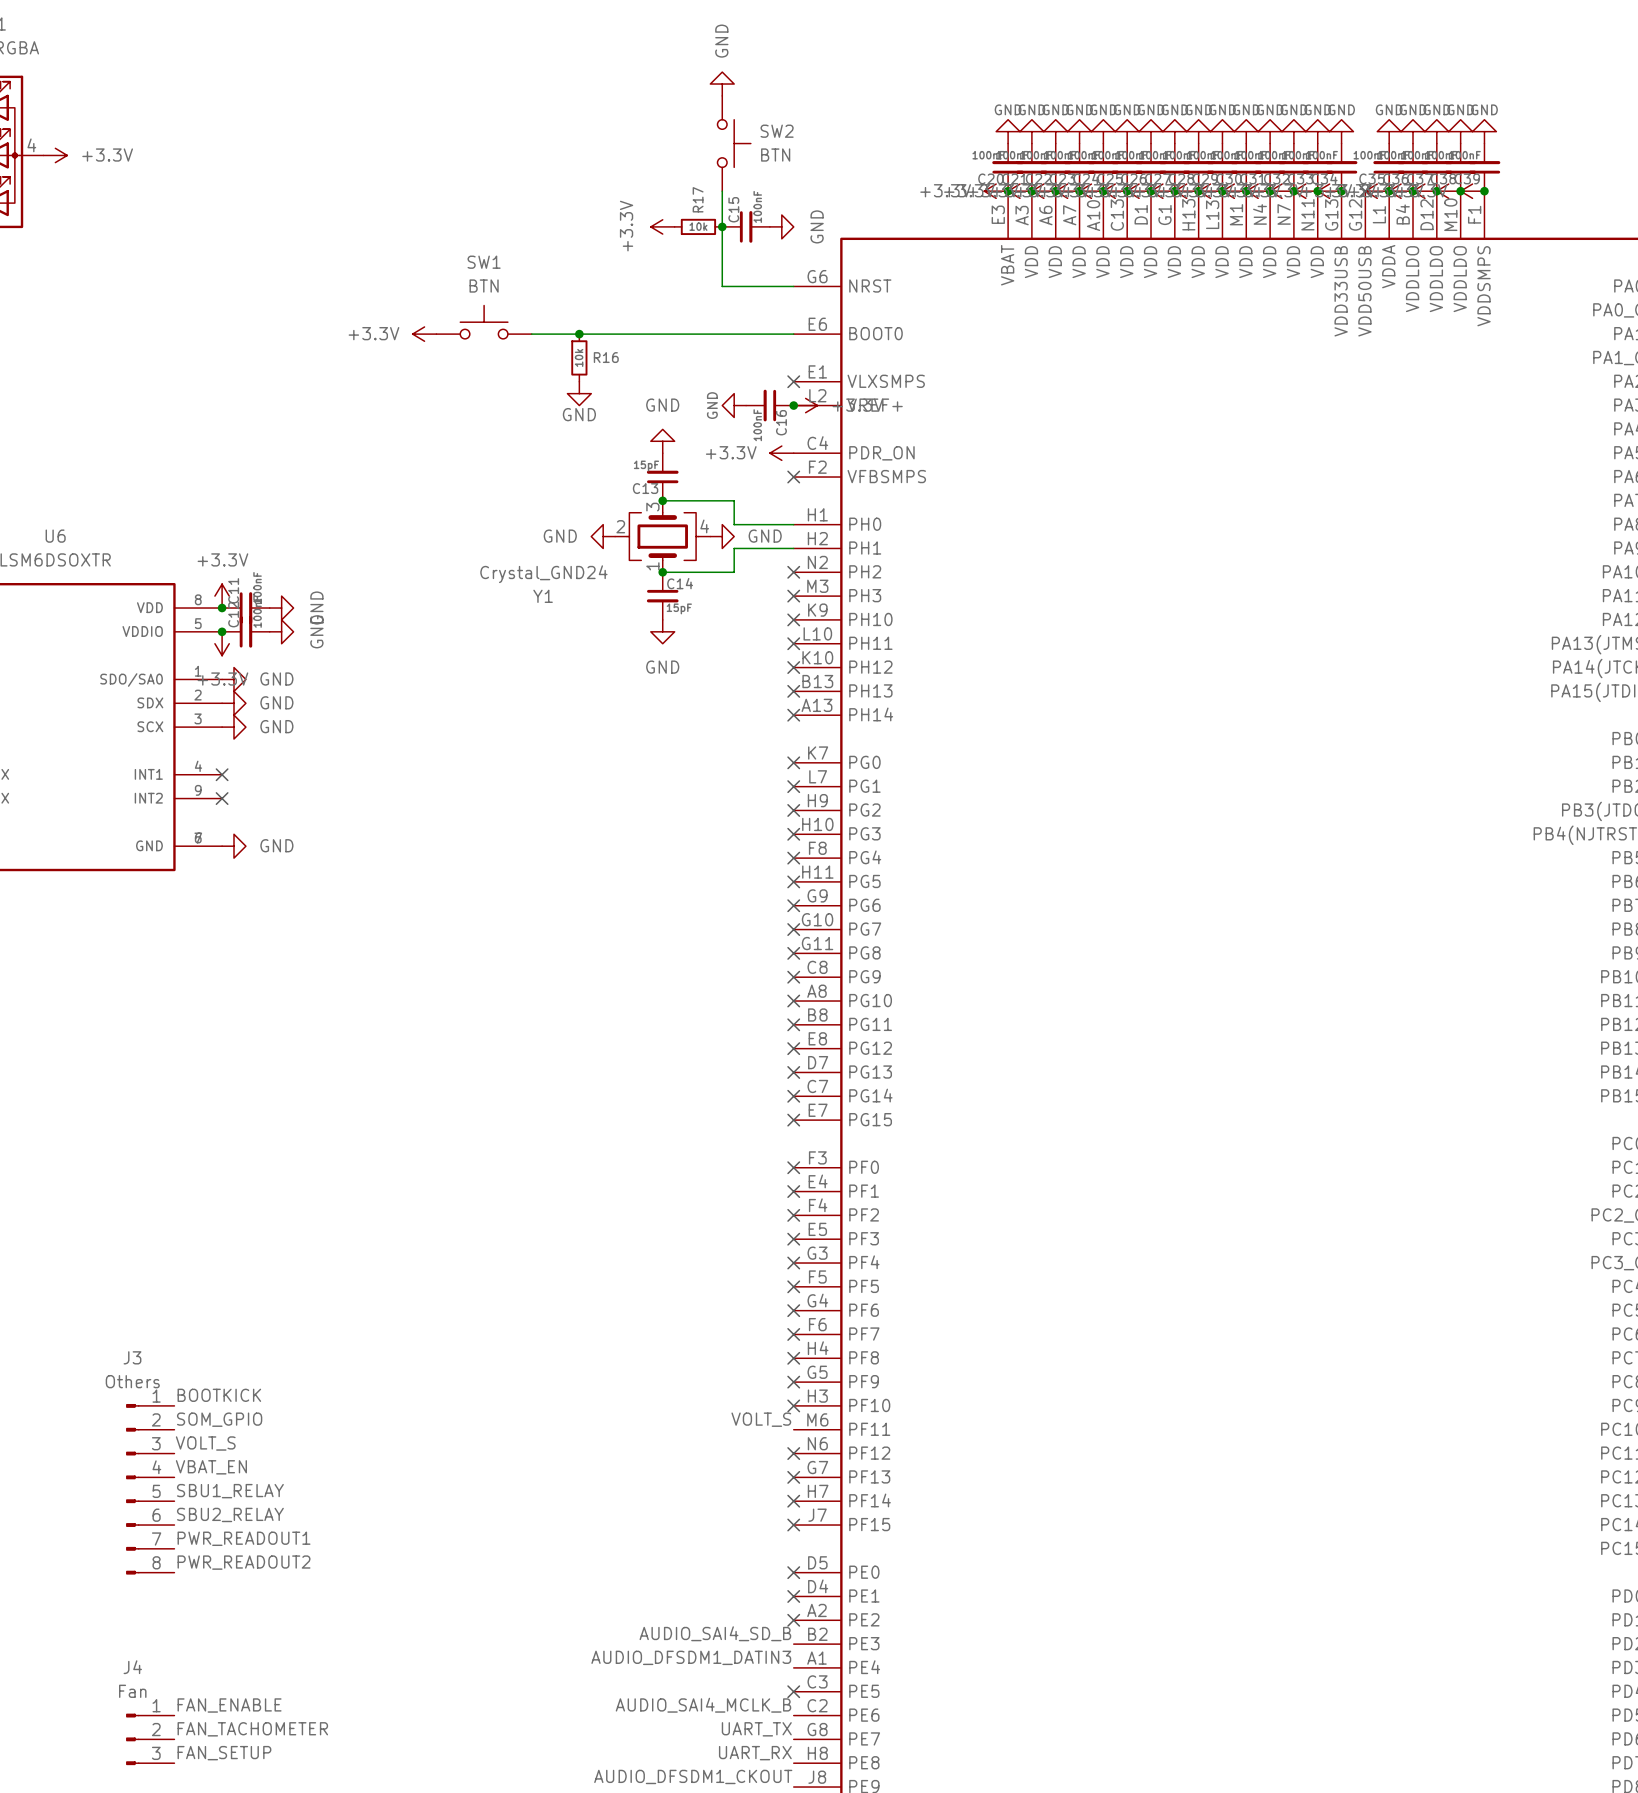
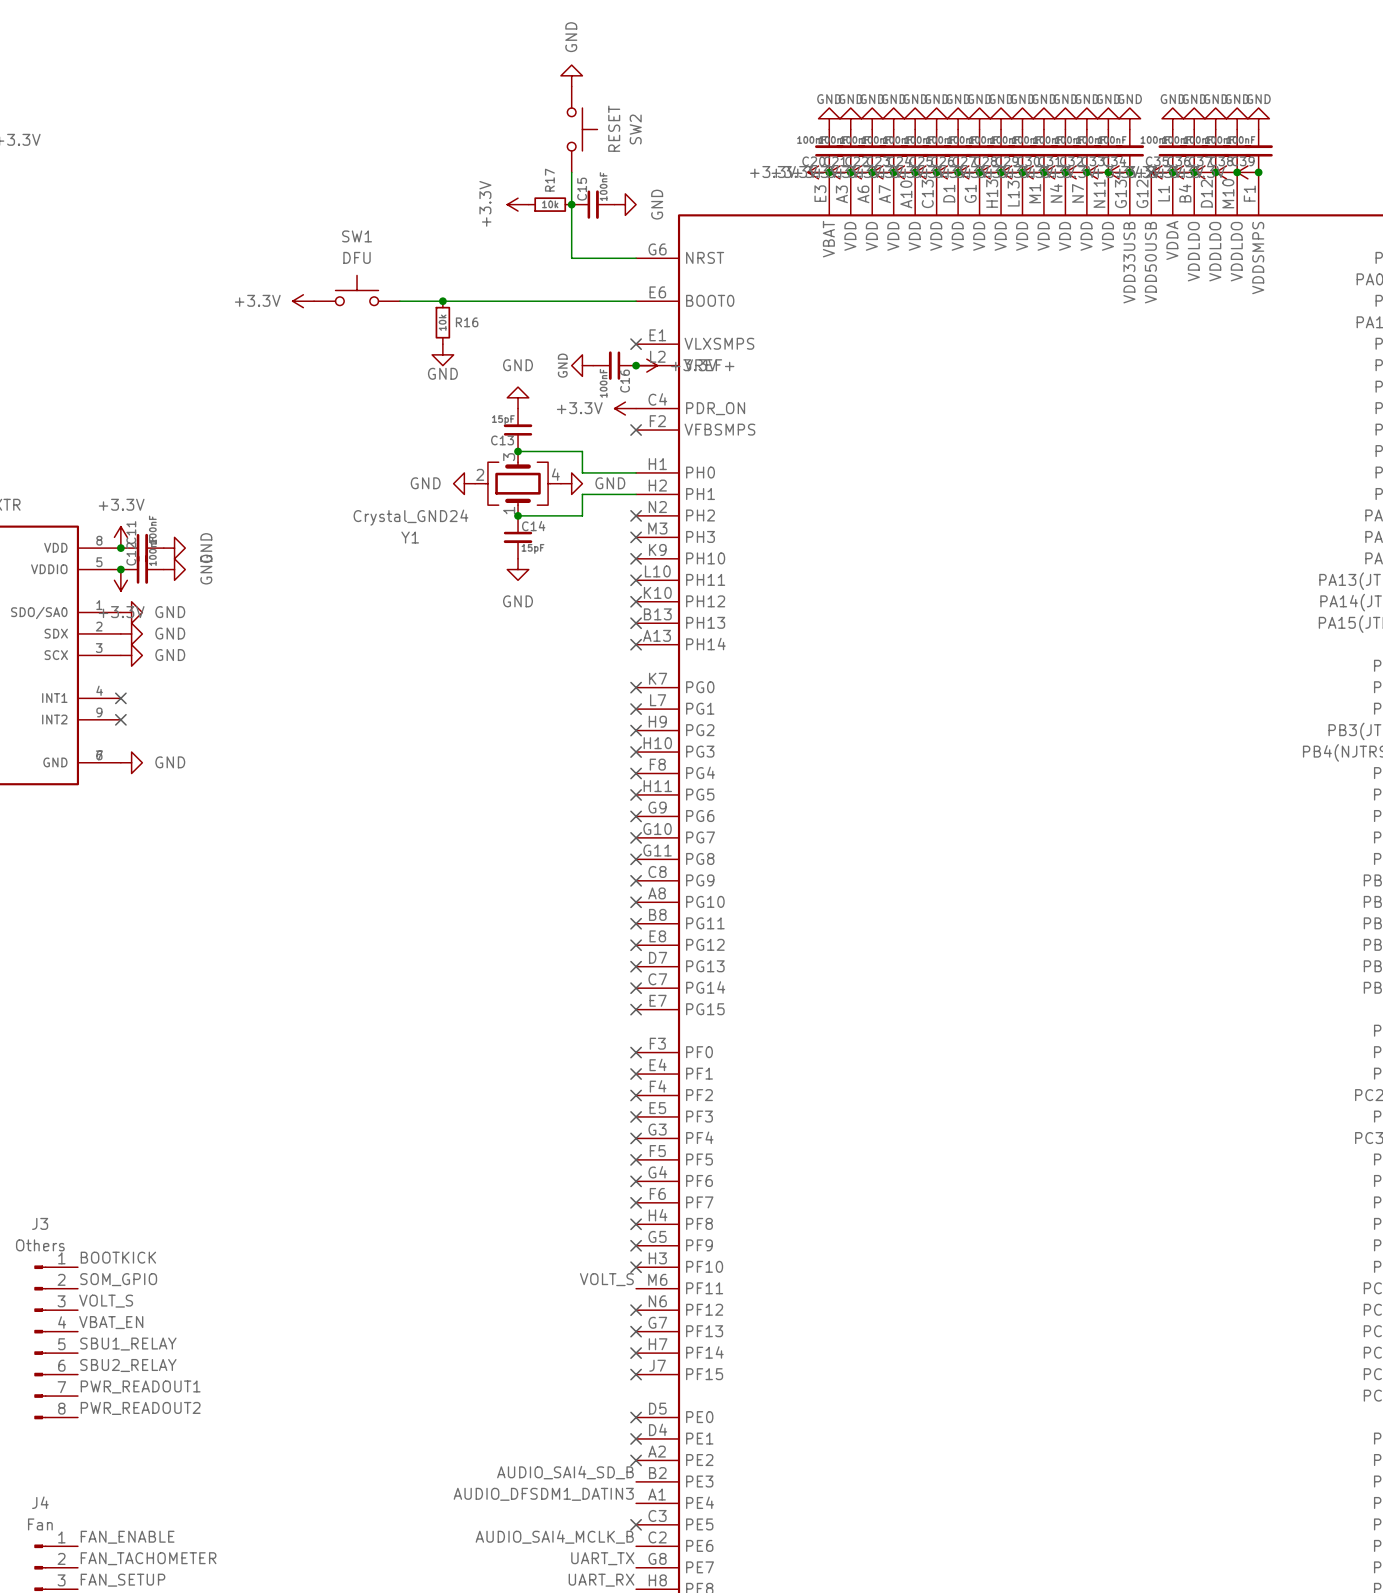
SW2 name rotation: 0° (777, 131) -> 90° counterclockwise (635, 129)
SW2 value: BTN (775, 155) -> RESET (614, 128)
SW1 value: BTN (484, 286) -> DFU (357, 257)

